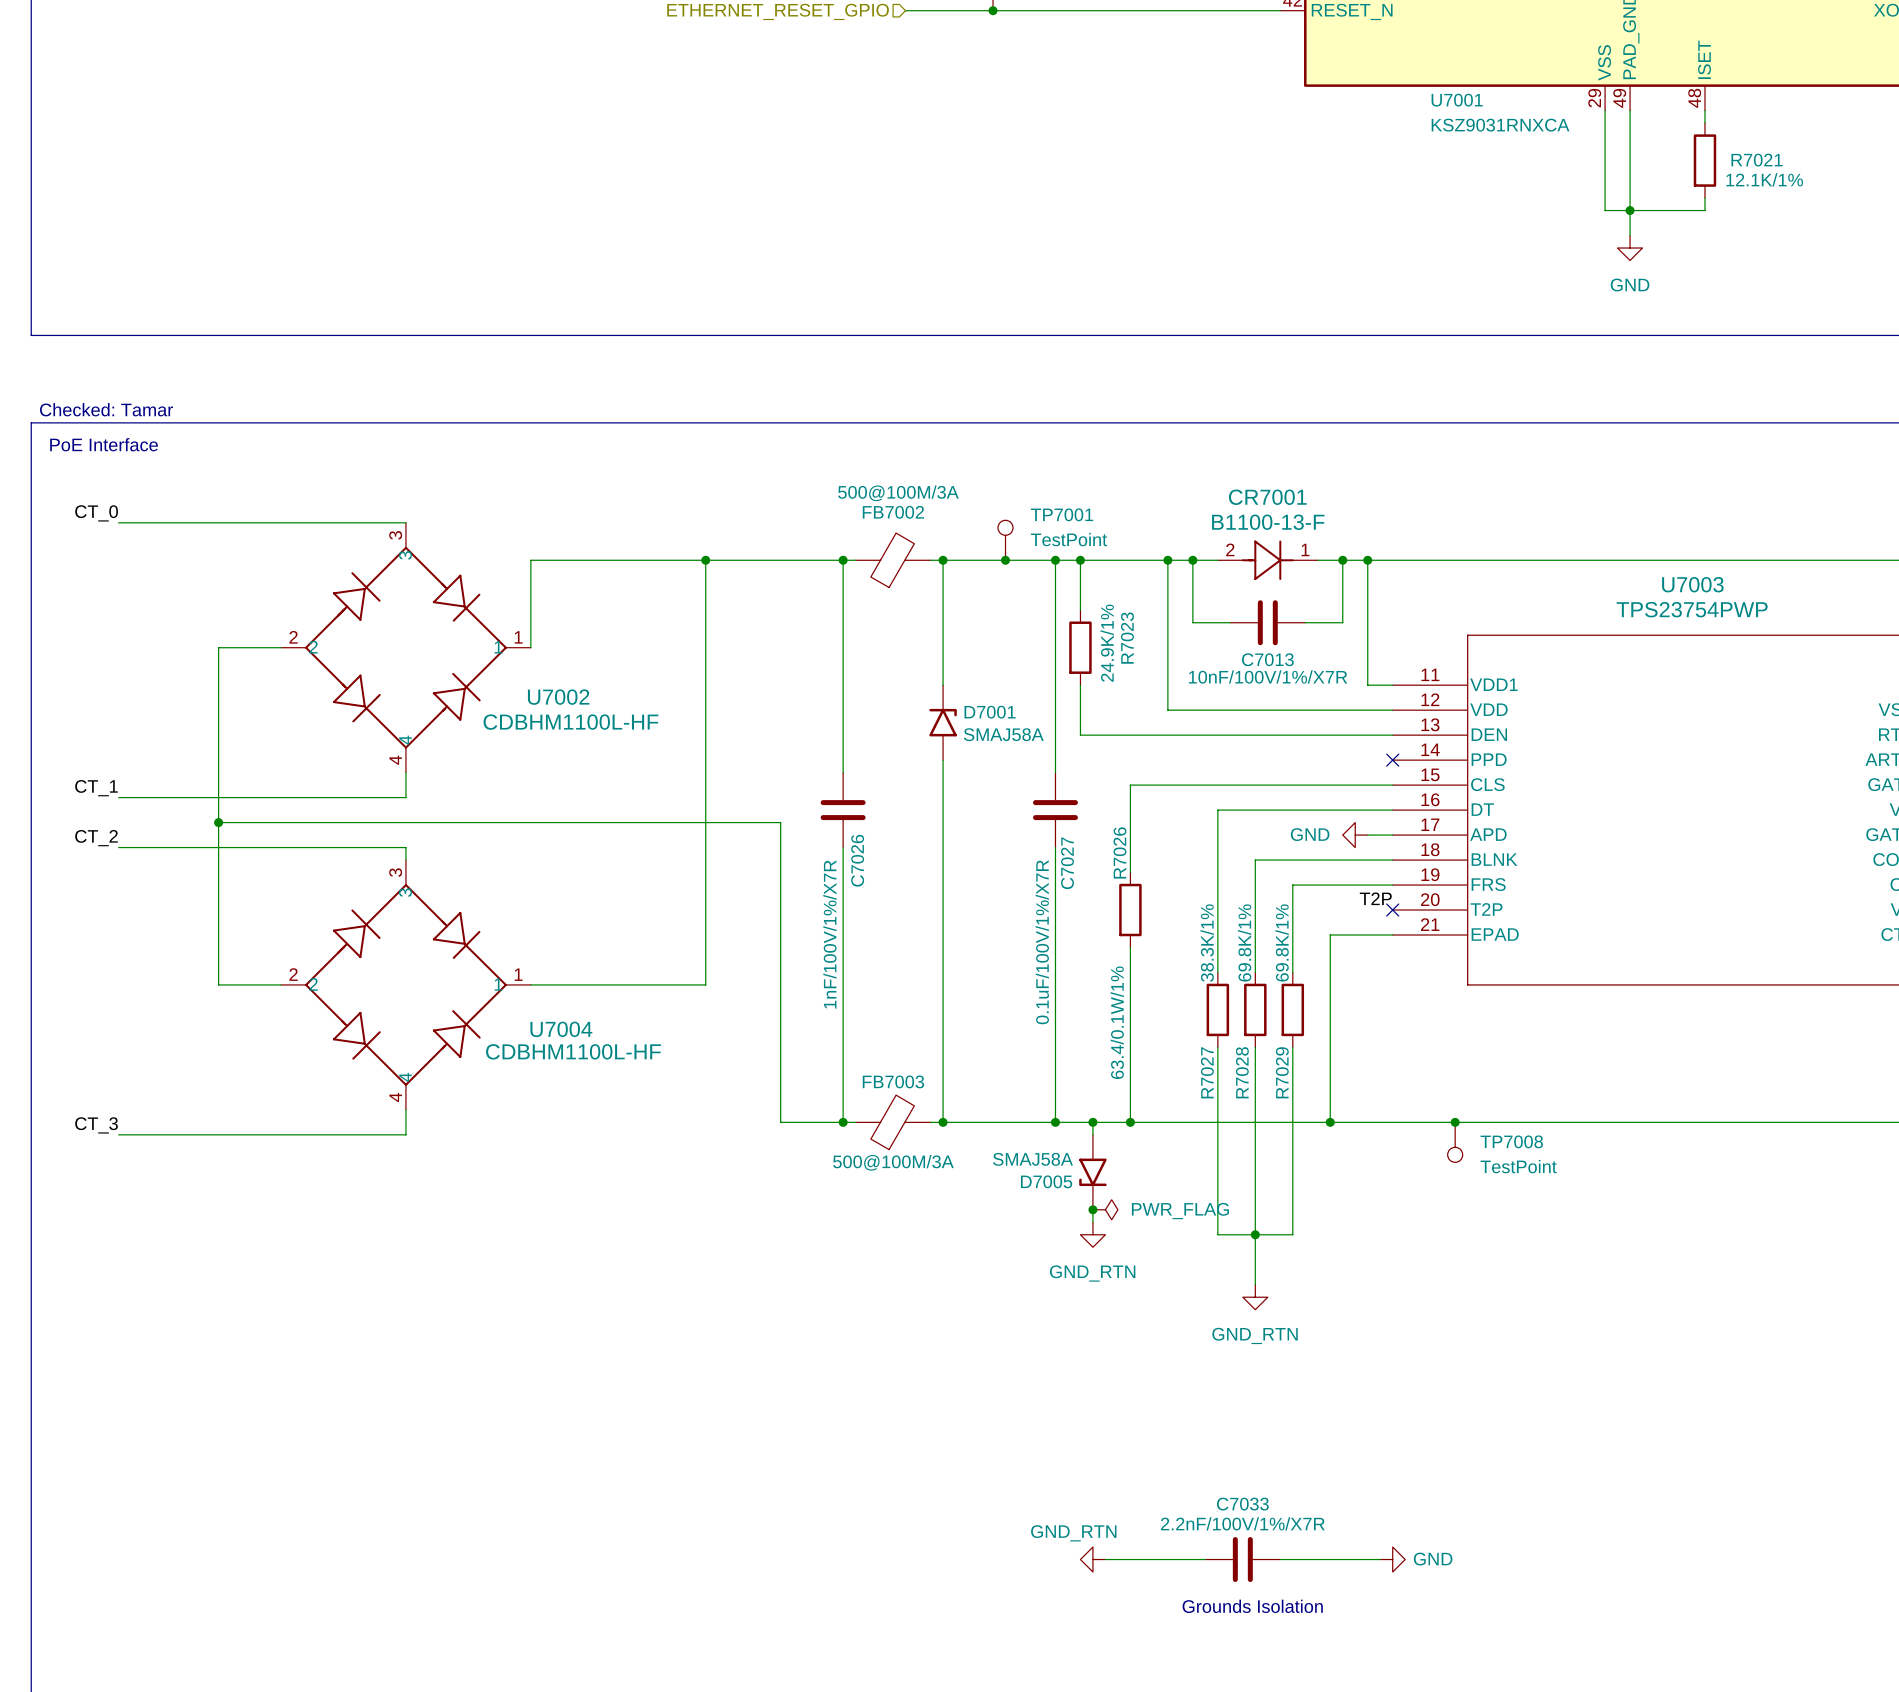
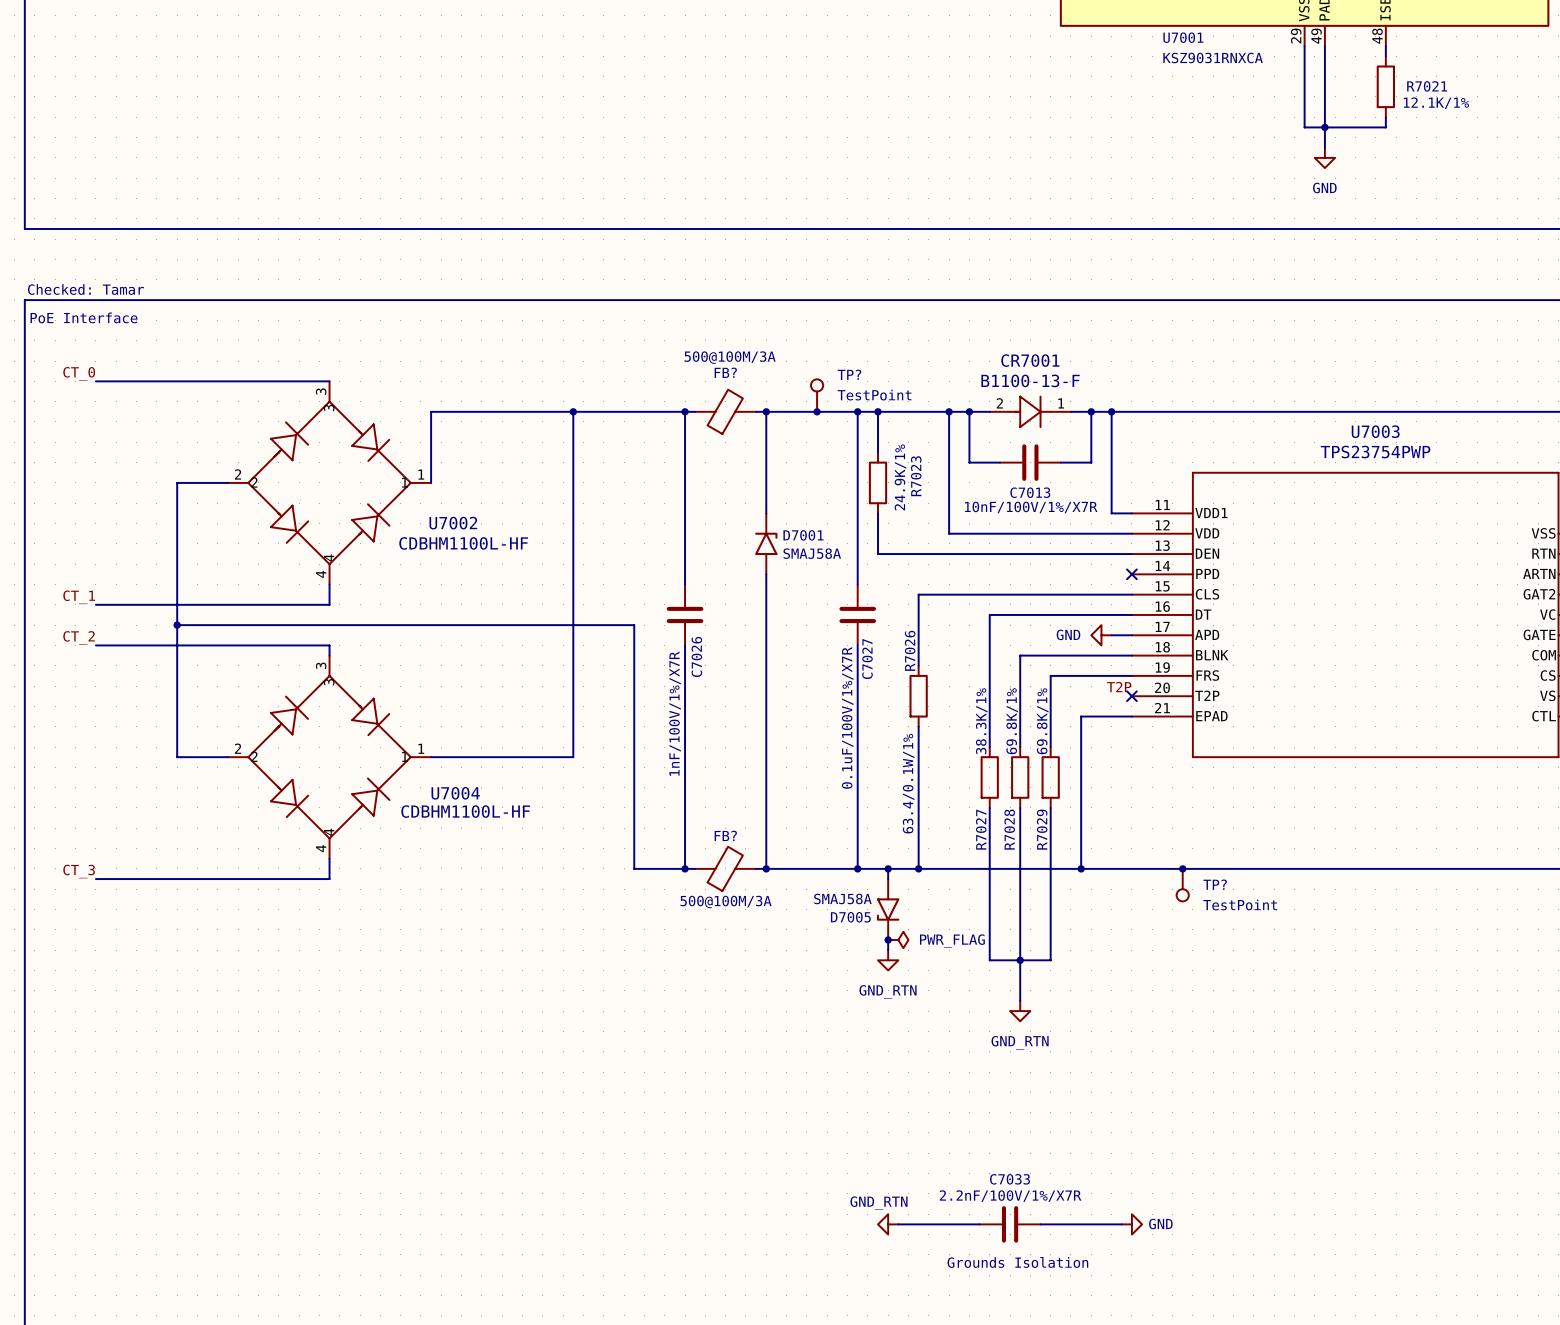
FB7002 name: FB7002 (893, 512) -> FB? (725, 372)
TP7001 name: TP7001 (1062, 514) -> TP? (849, 374)
FB7003 name: FB7003 (893, 1081) -> FB? (725, 835)
TP7008 name: TP7008 (1511, 1141) -> TP? (1215, 884)

